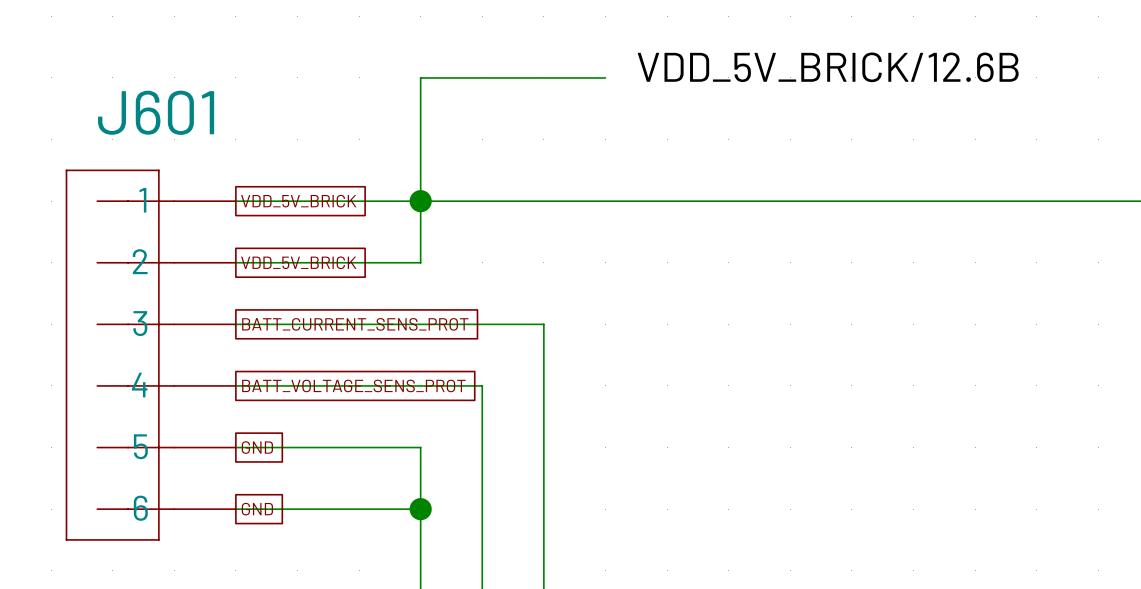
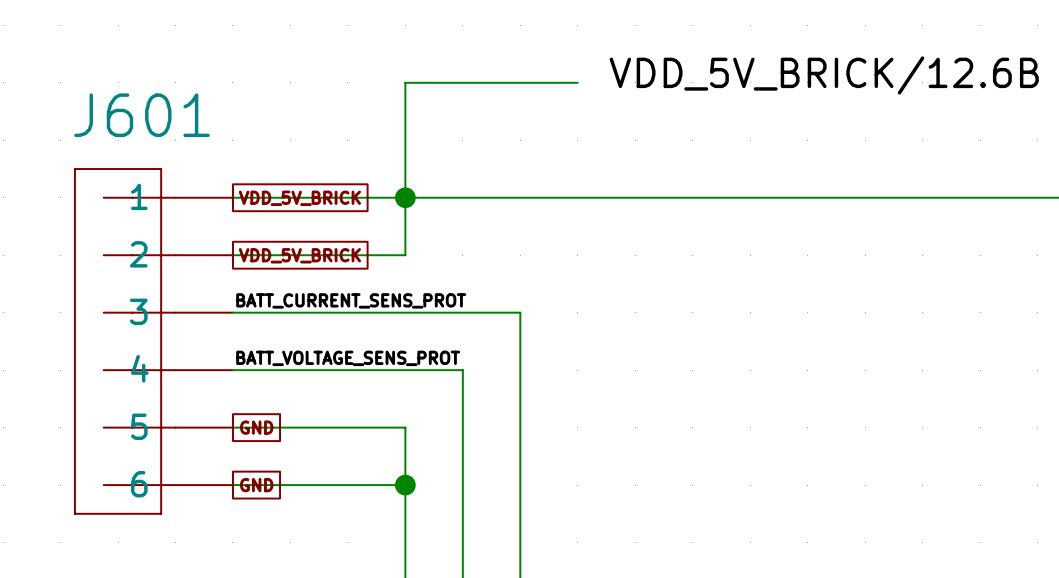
label: none -> BATT_CURRENT_SENS_PROT (351, 300)
global label: BATT_CURRENT_SENS_PROT (355, 324) -> none
label: none -> BATT_VOLTAGE_SENS_PROT (348, 358)
global label: BATT_VOLTAGE_SENS_PROT (353, 385) -> none

